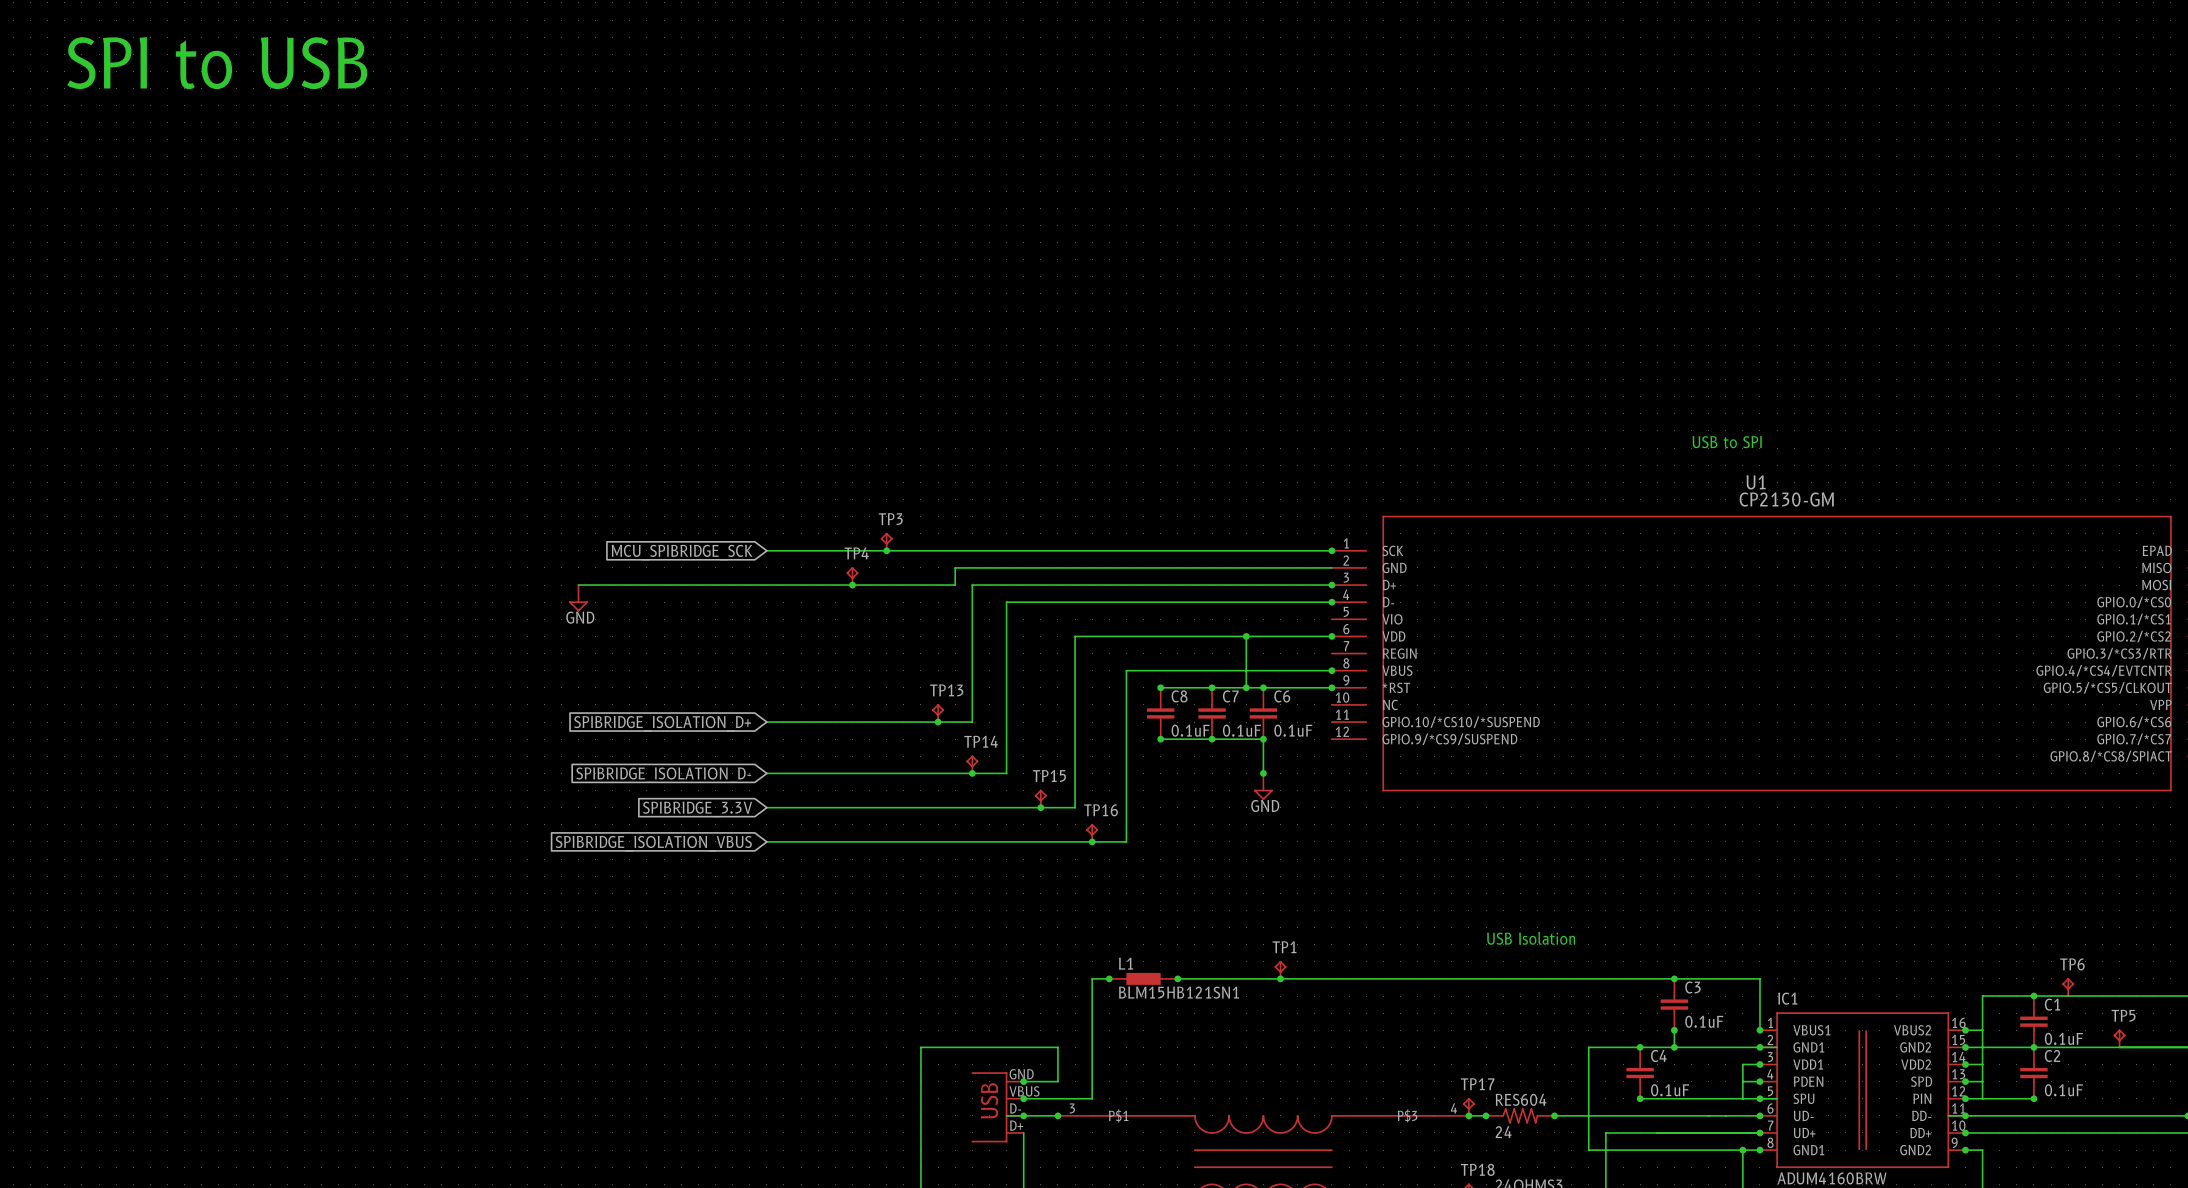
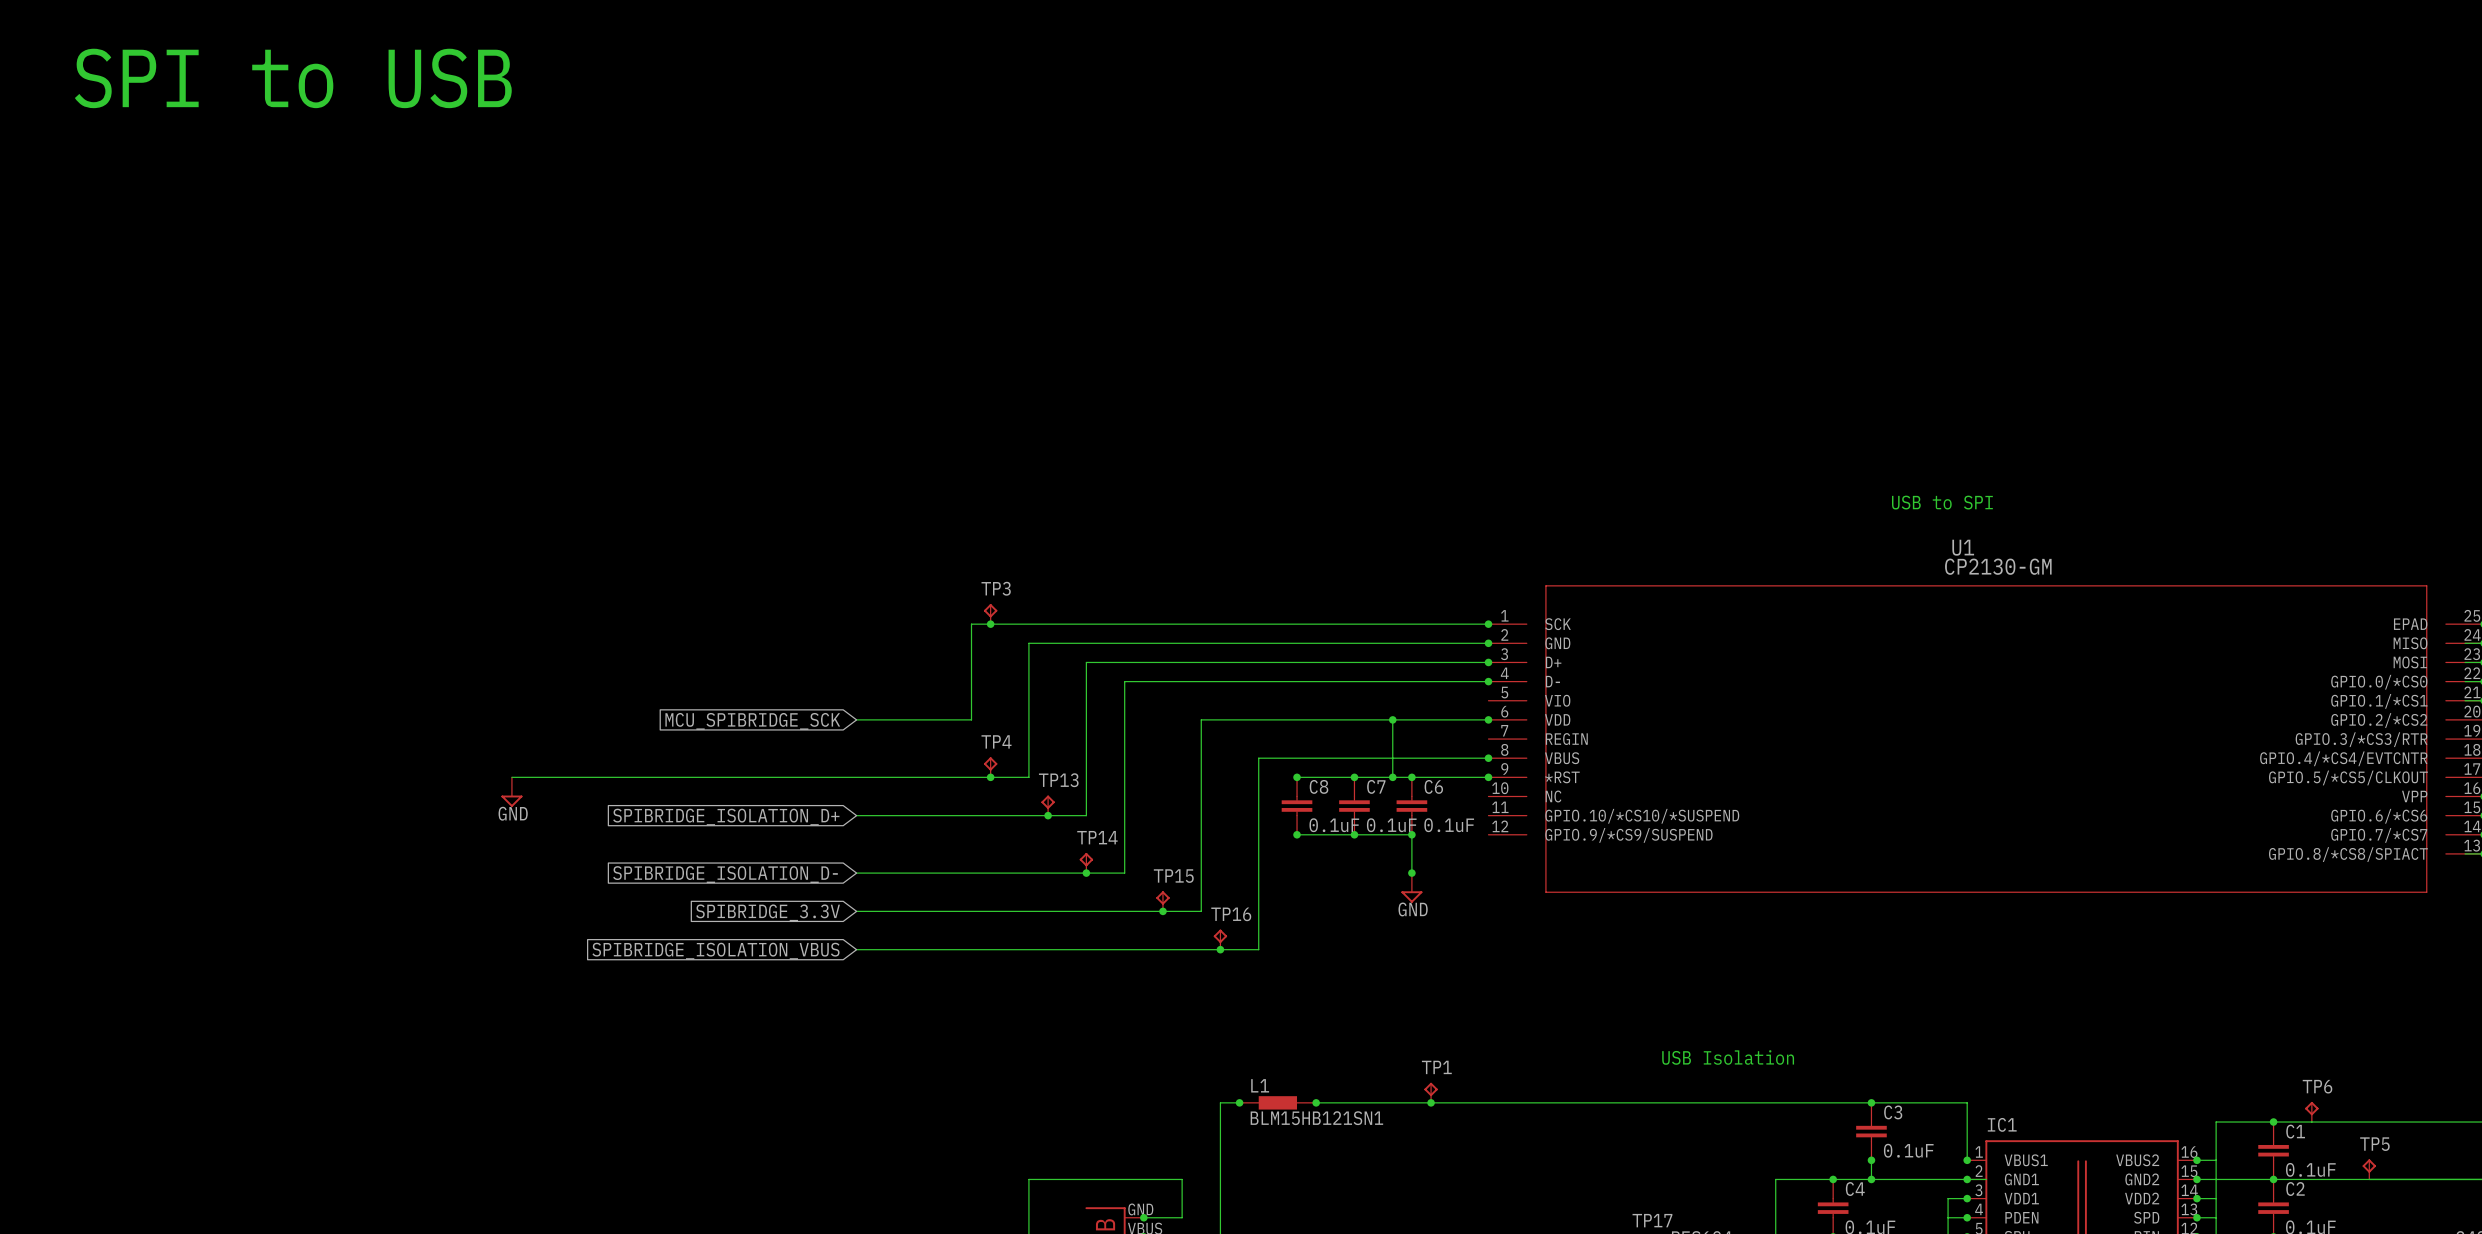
wire: (766, 550) (869, 550) -> (856, 719) (971, 719) (971, 624)
global label position: MCU_SPIBRIDGE_SCK (682, 552) -> MCU_SPIBRIDGE_SCK (752, 721)
wire: (955, 567) (955, 585) (578, 585) -> (1067, 643) (1028, 643) (1028, 777) (511, 777)
junction: none -> (1488, 643)
TP4 position: (852, 576) -> (990, 767)
junction: (852, 585) -> none
power symbol position: GND (578, 598) -> GND (511, 792)
junction: none -> (990, 777)

